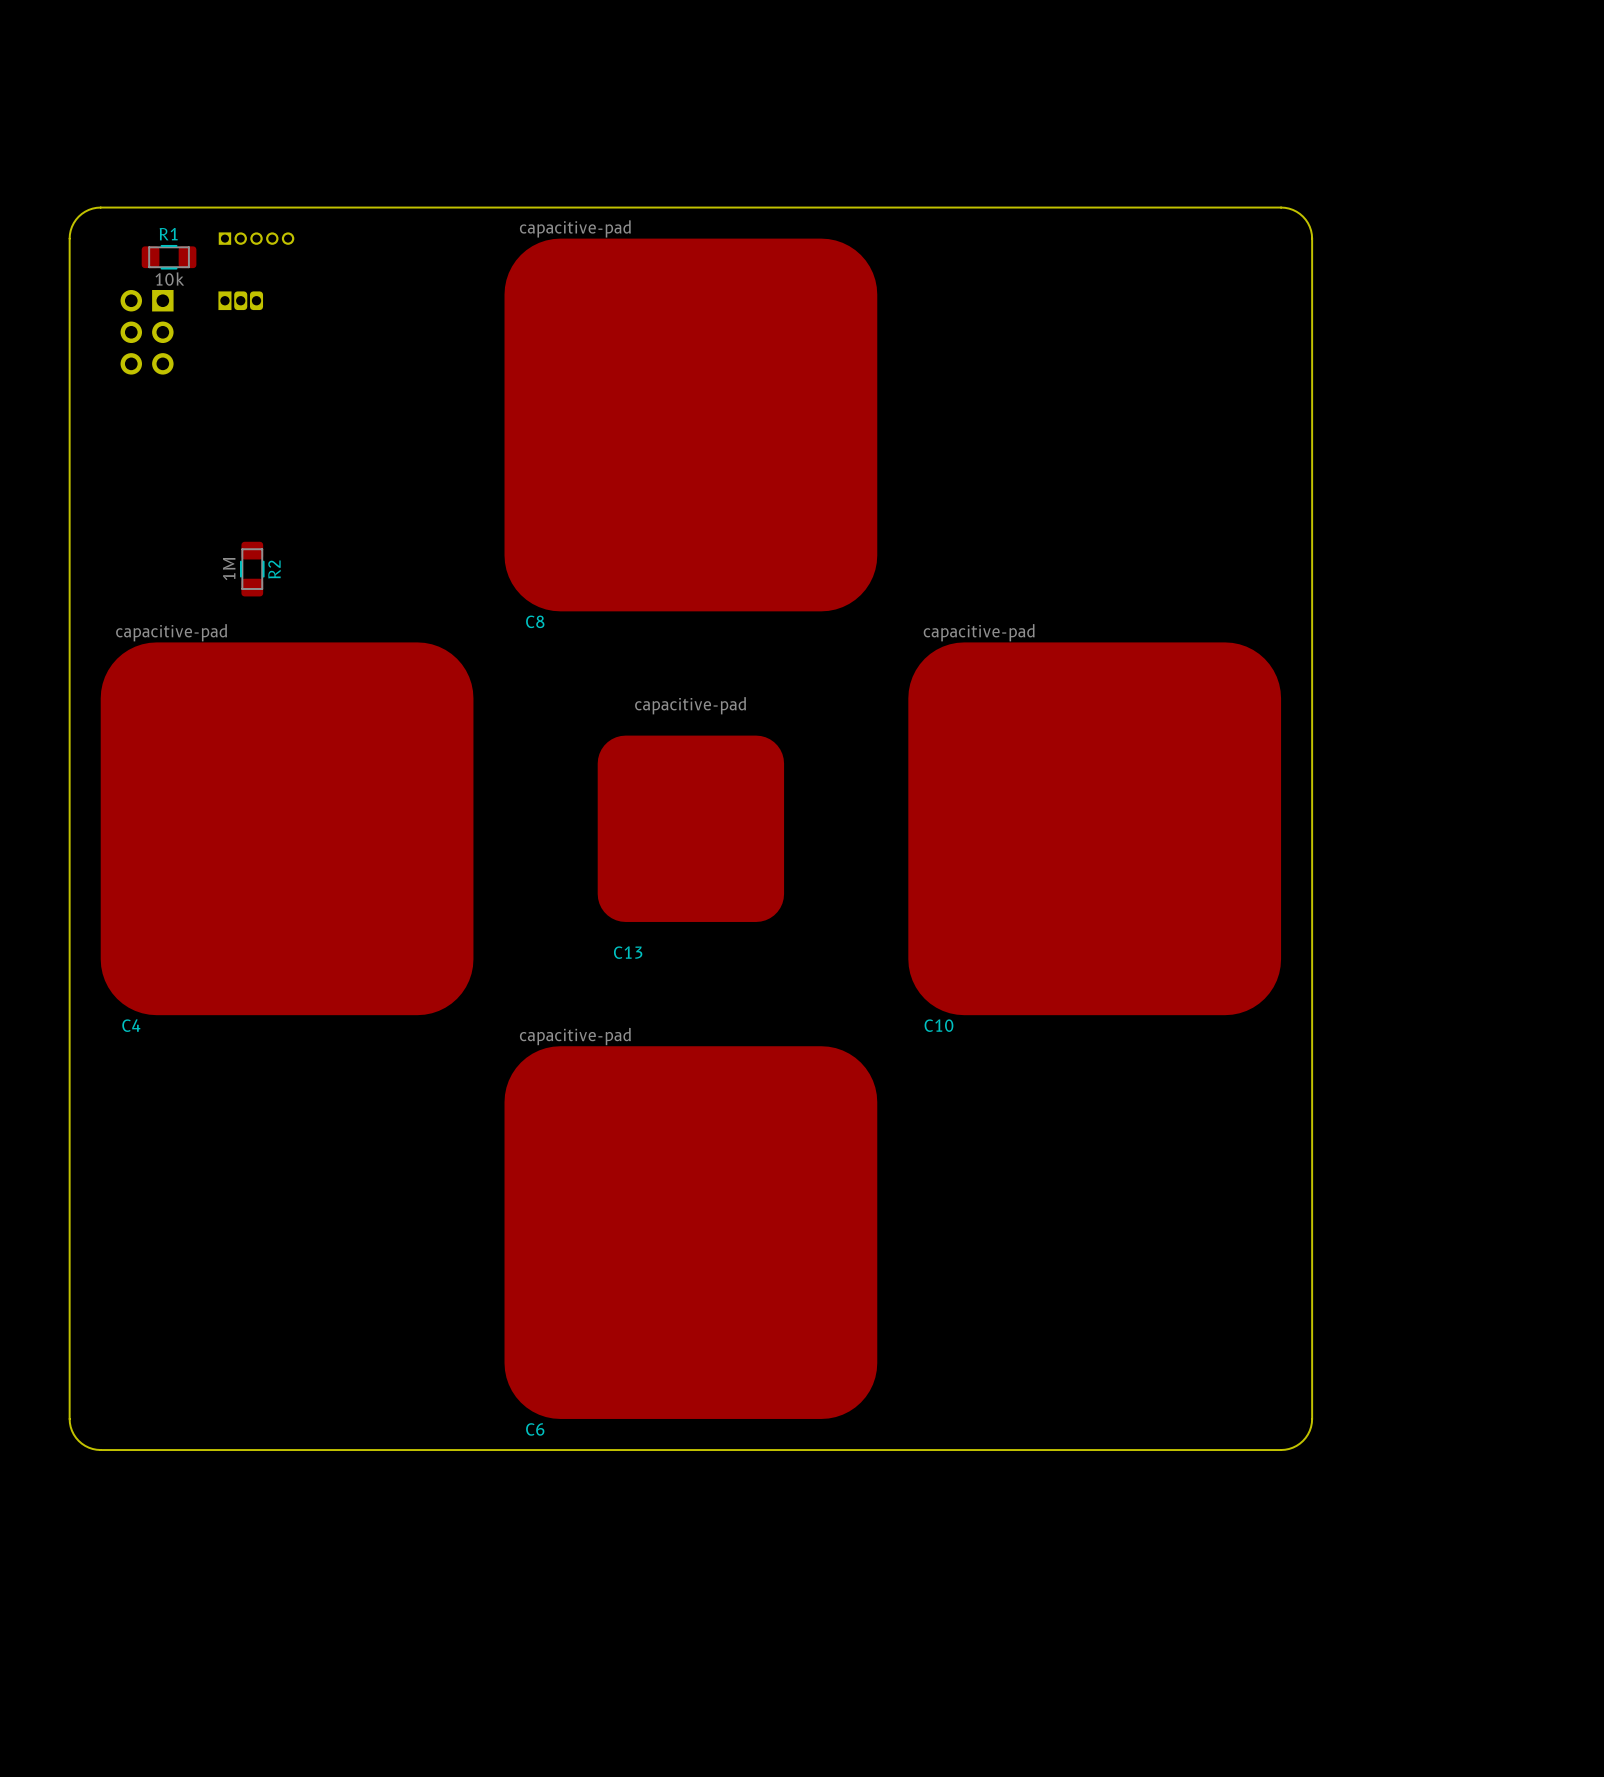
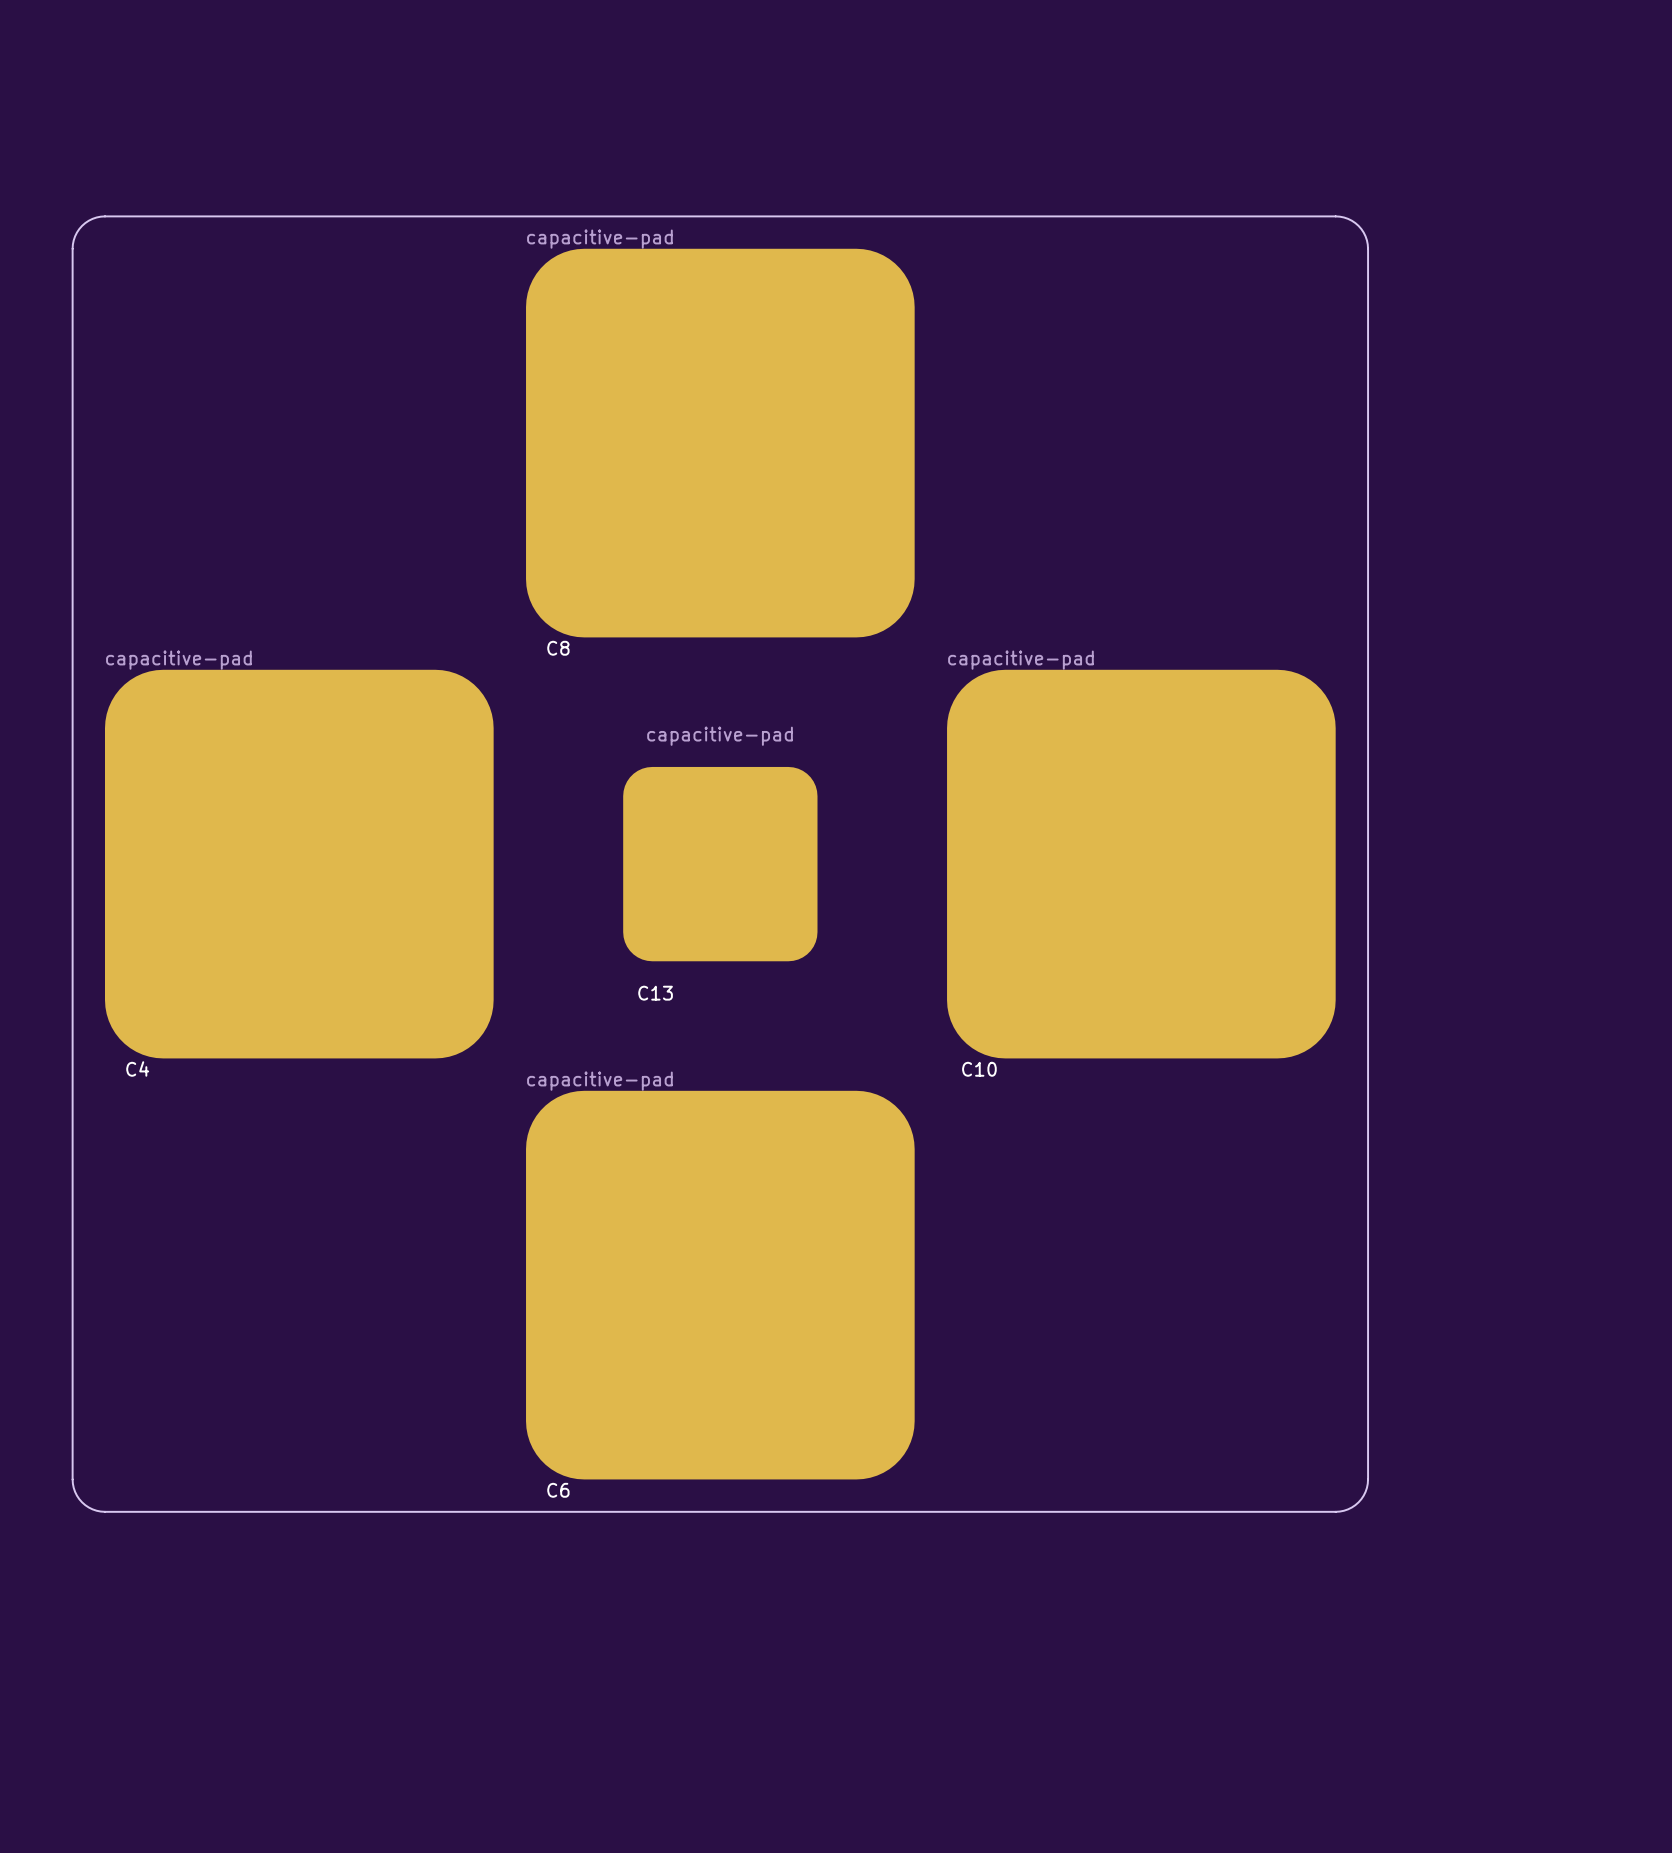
part: (256, 238) -> none
R1: 10k (169, 257) -> none
part: (240, 300) -> none
part: (147, 332) -> none
R2: 1M (252, 569) -> none

